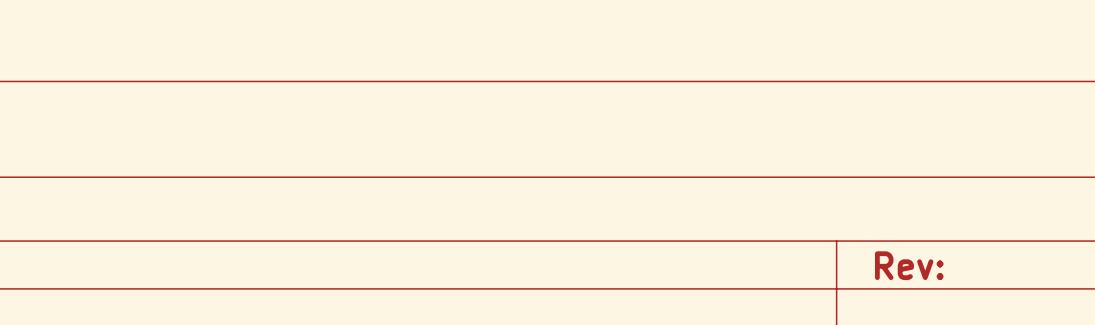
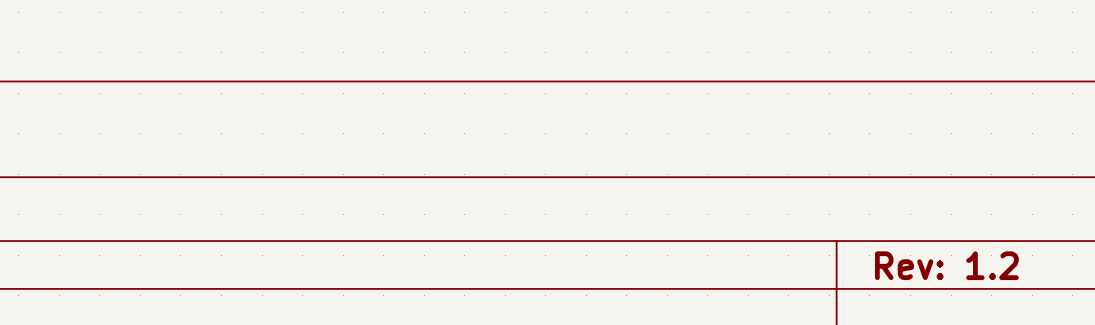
title block: Rev: (909, 265) -> Rev: 1.2 (946, 265)

